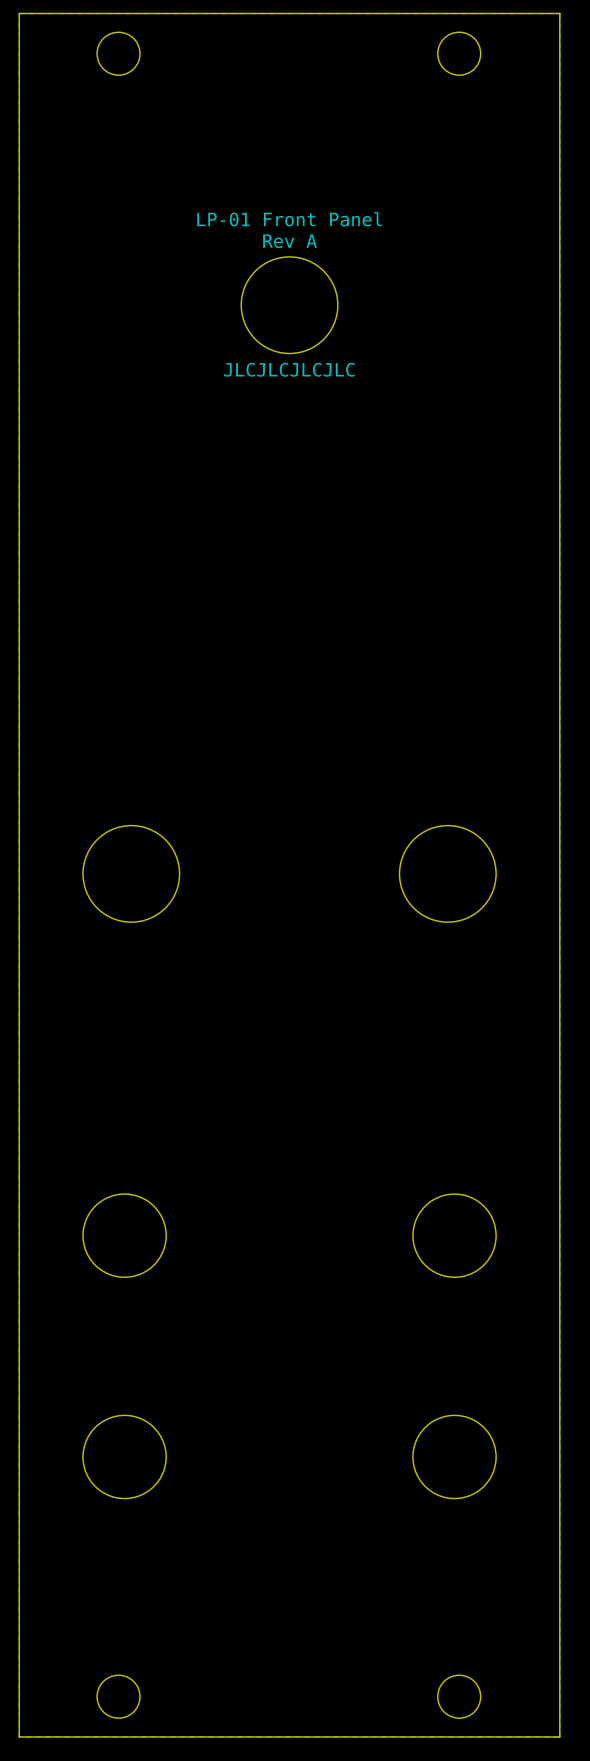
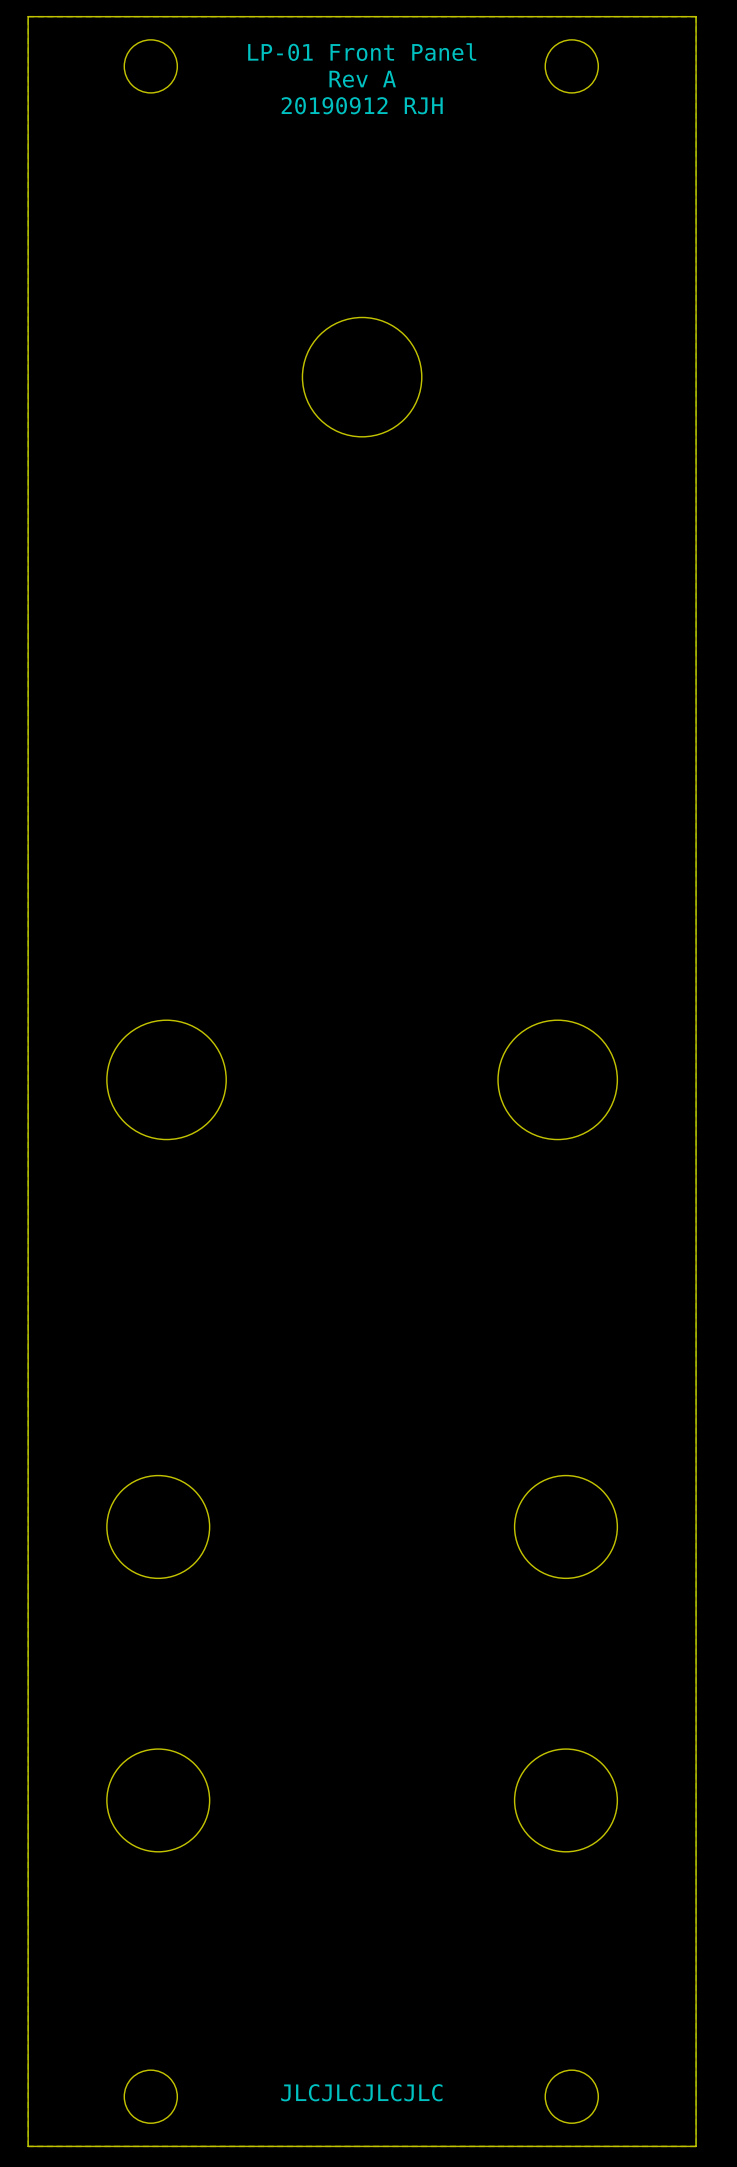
text: none -> 20190912 RJH (362, 105)
text position: LP-01 Front Panel (289, 219) -> LP-01 Front Panel (362, 52)
text position: Rev A (290, 241) -> Rev A (362, 79)
text: JLCJLCJLCJLC (289, 369) -> none
text: none -> JLCJLCJLCJLC (361, 2092)

